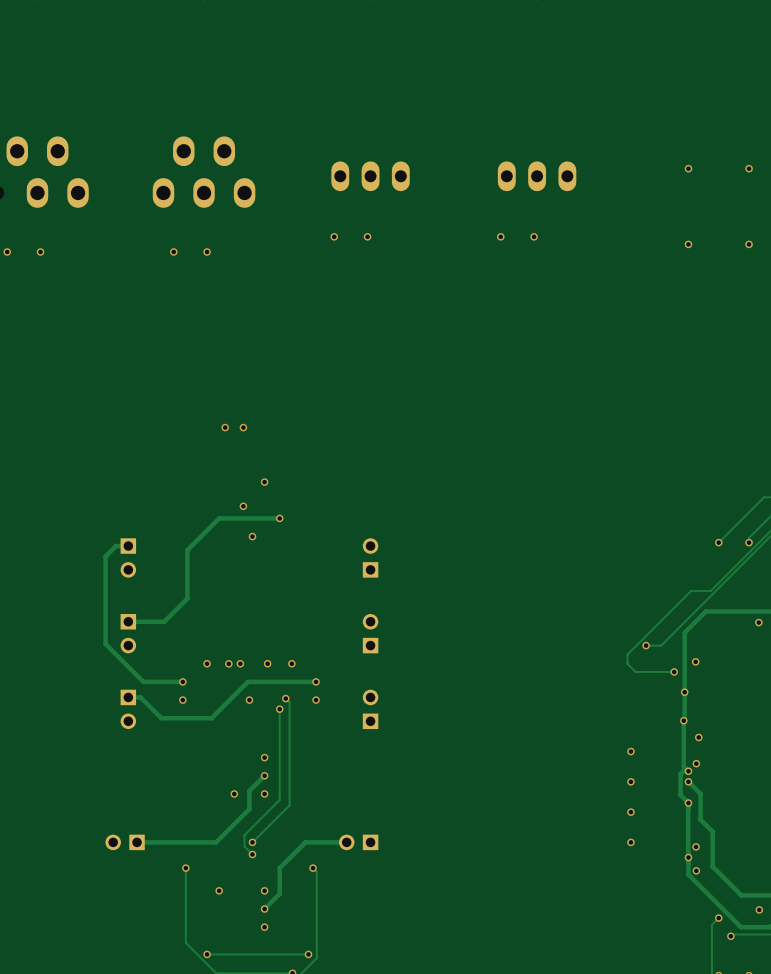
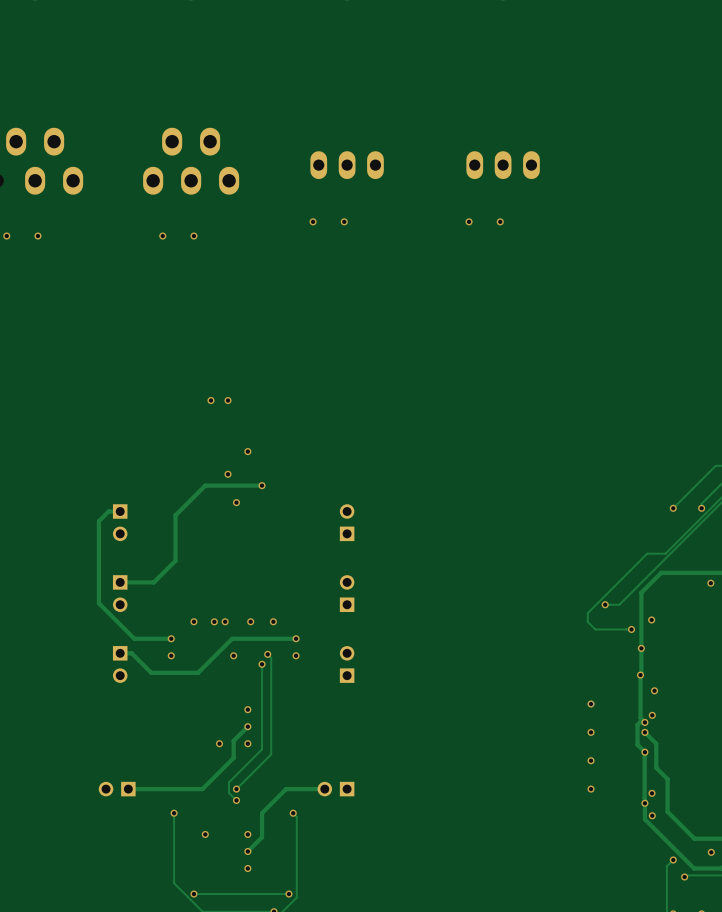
via: (688, 168) -> none
via: (749, 168) -> none
via: (688, 244) -> none
via: (749, 244) -> none

